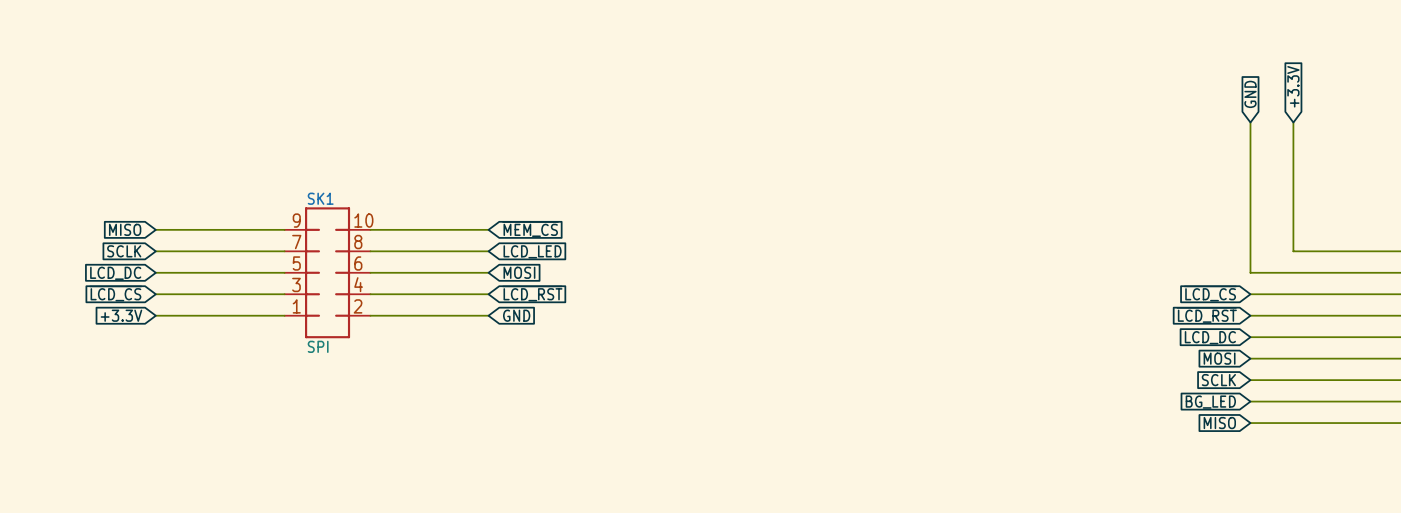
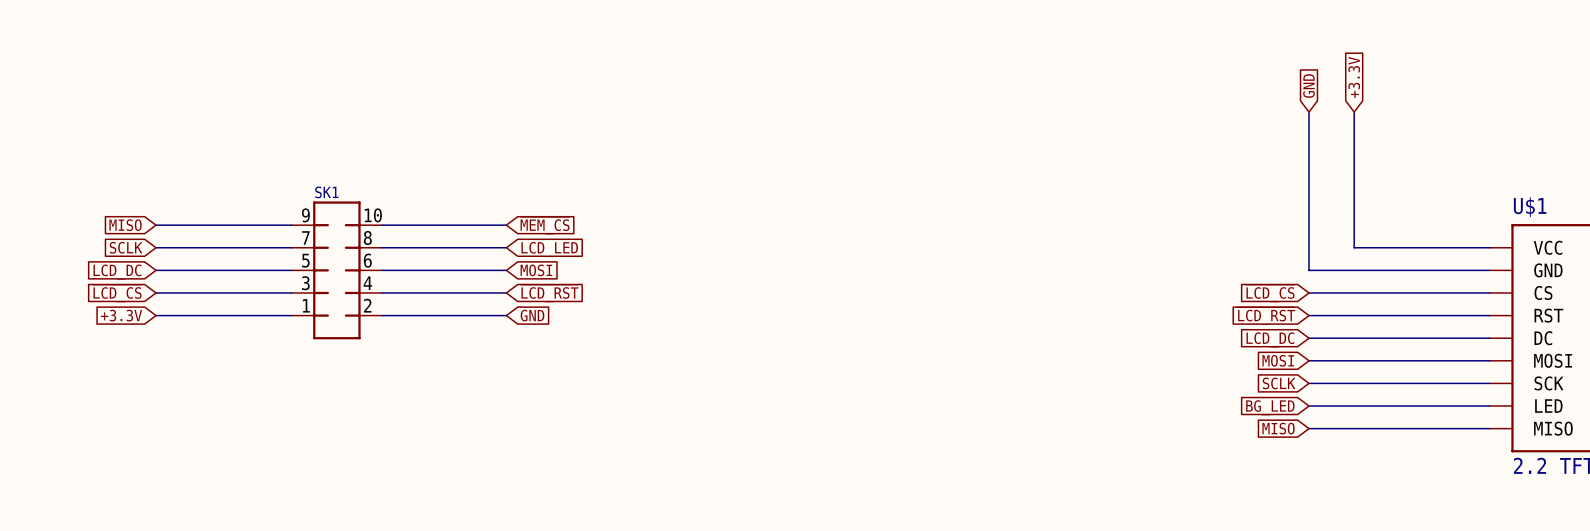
SK1 value: SPI (318, 346) -> none

